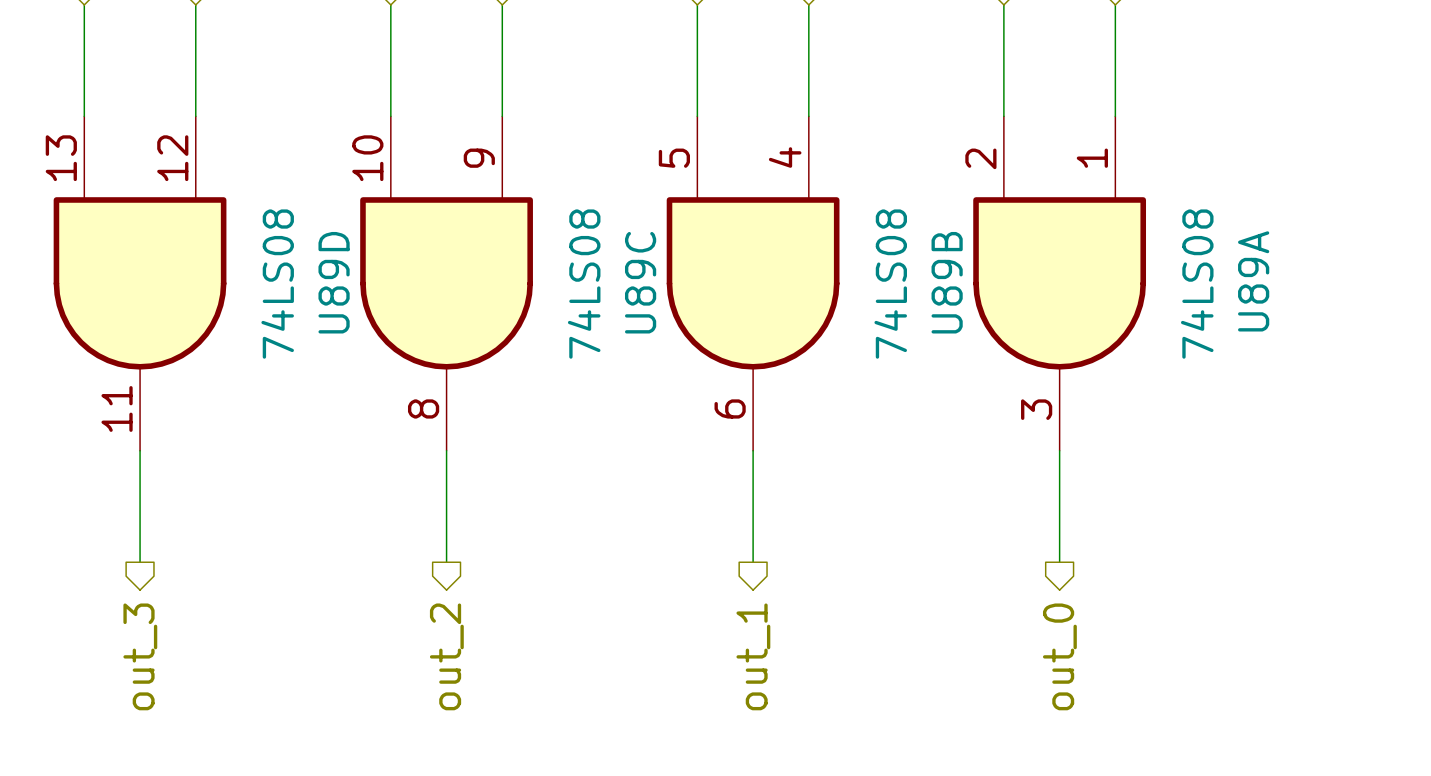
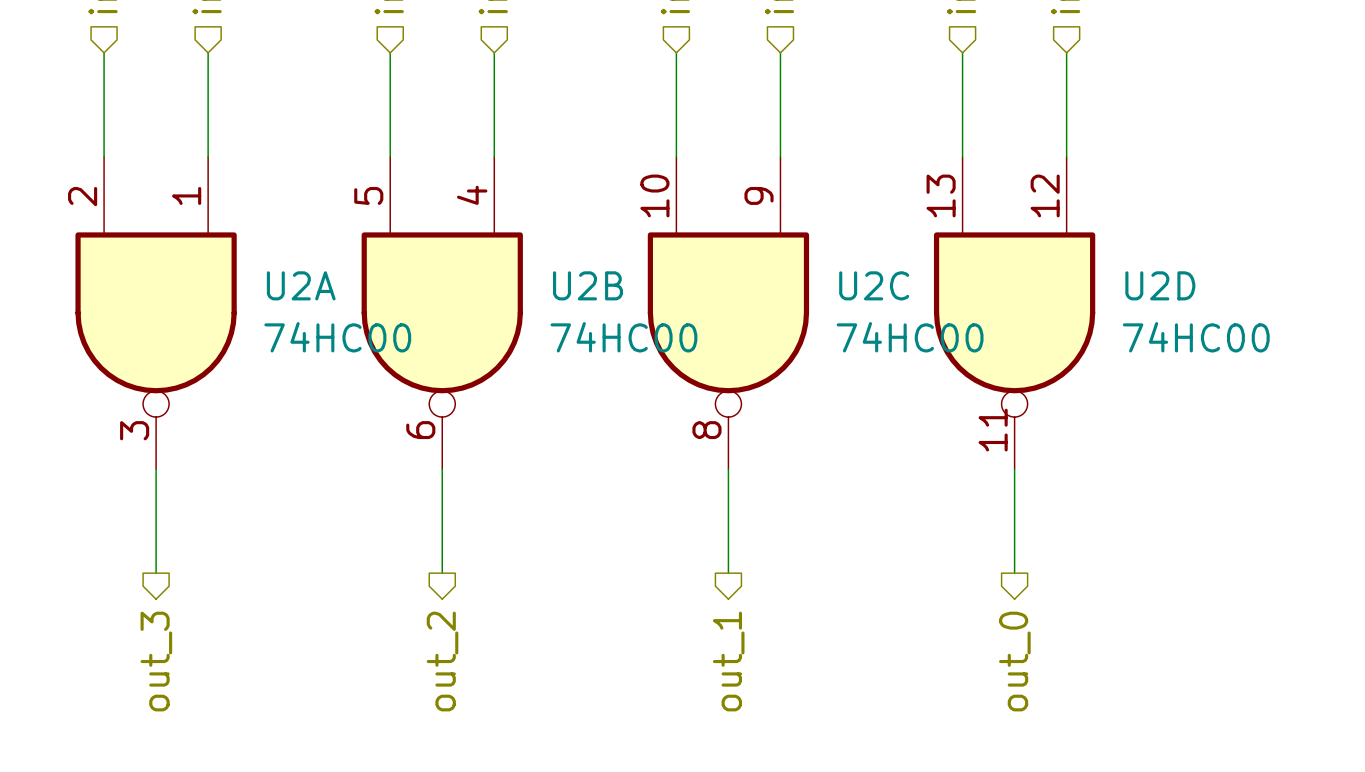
U89D: 74LS08 (140, 283) -> none
U2A: none -> 74HC00 (156, 313)
U89C: 74LS08 (446, 283) -> none
U2B: none -> 74HC00 (442, 313)
U89B: 74LS08 (753, 283) -> none
U2C: none -> 74HC00 (728, 313)
U89A: 74LS08 (1059, 283) -> none
U2D: none -> 74HC00 (1014, 313)

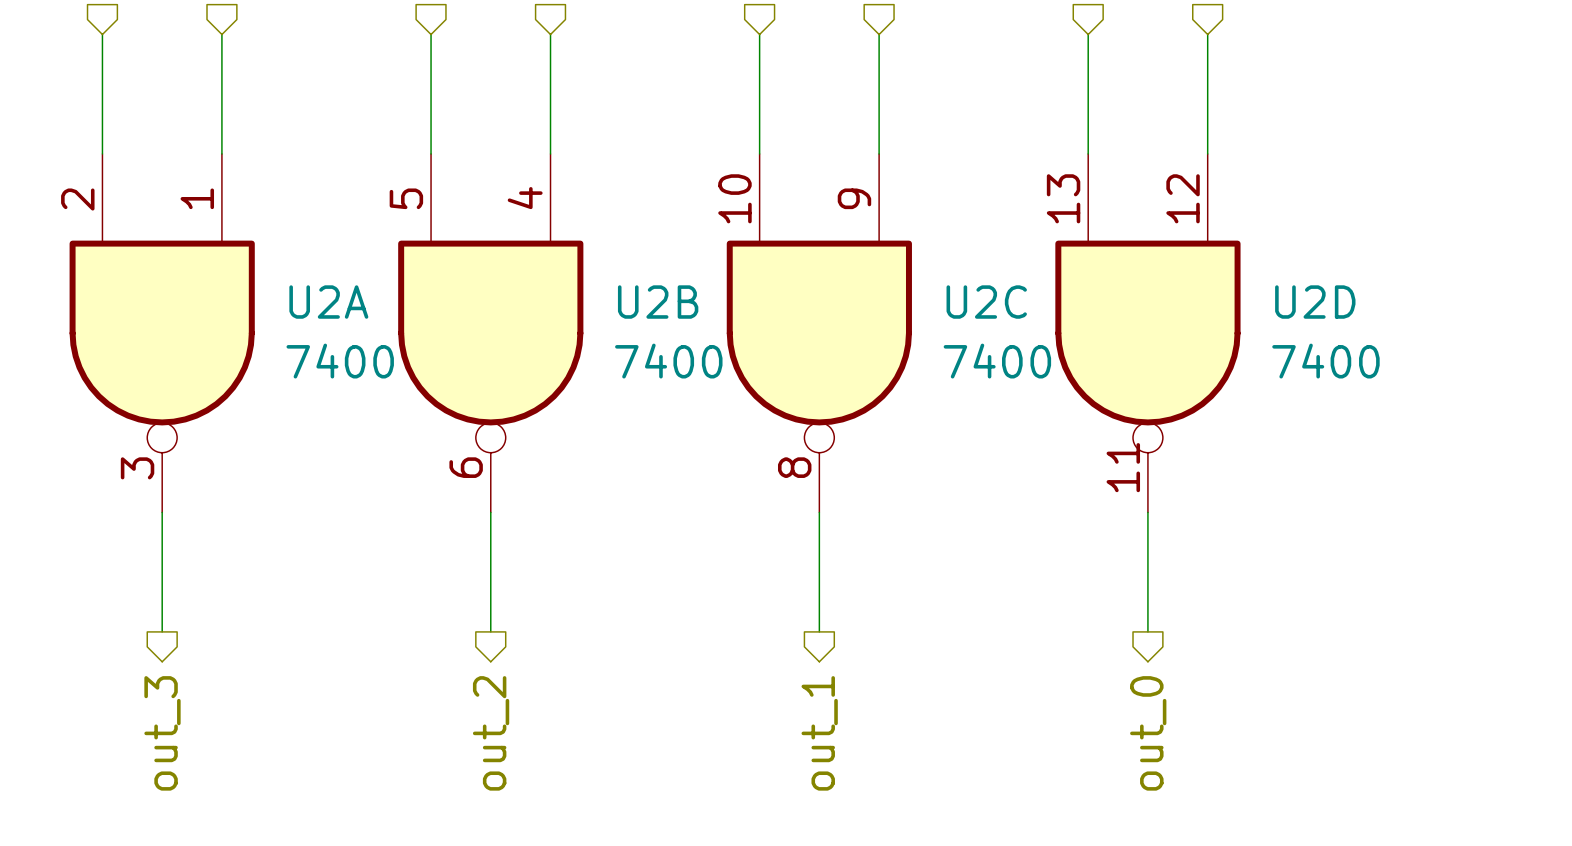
U2A value: 74HC00 (337, 337) -> 7400 (340, 361)
U2B value: 74HC00 (623, 337) -> 7400 (668, 361)
U2C value: 74HC00 (910, 337) -> 7400 (997, 361)
U2D value: 74HC00 (1196, 337) -> 7400 (1325, 361)

